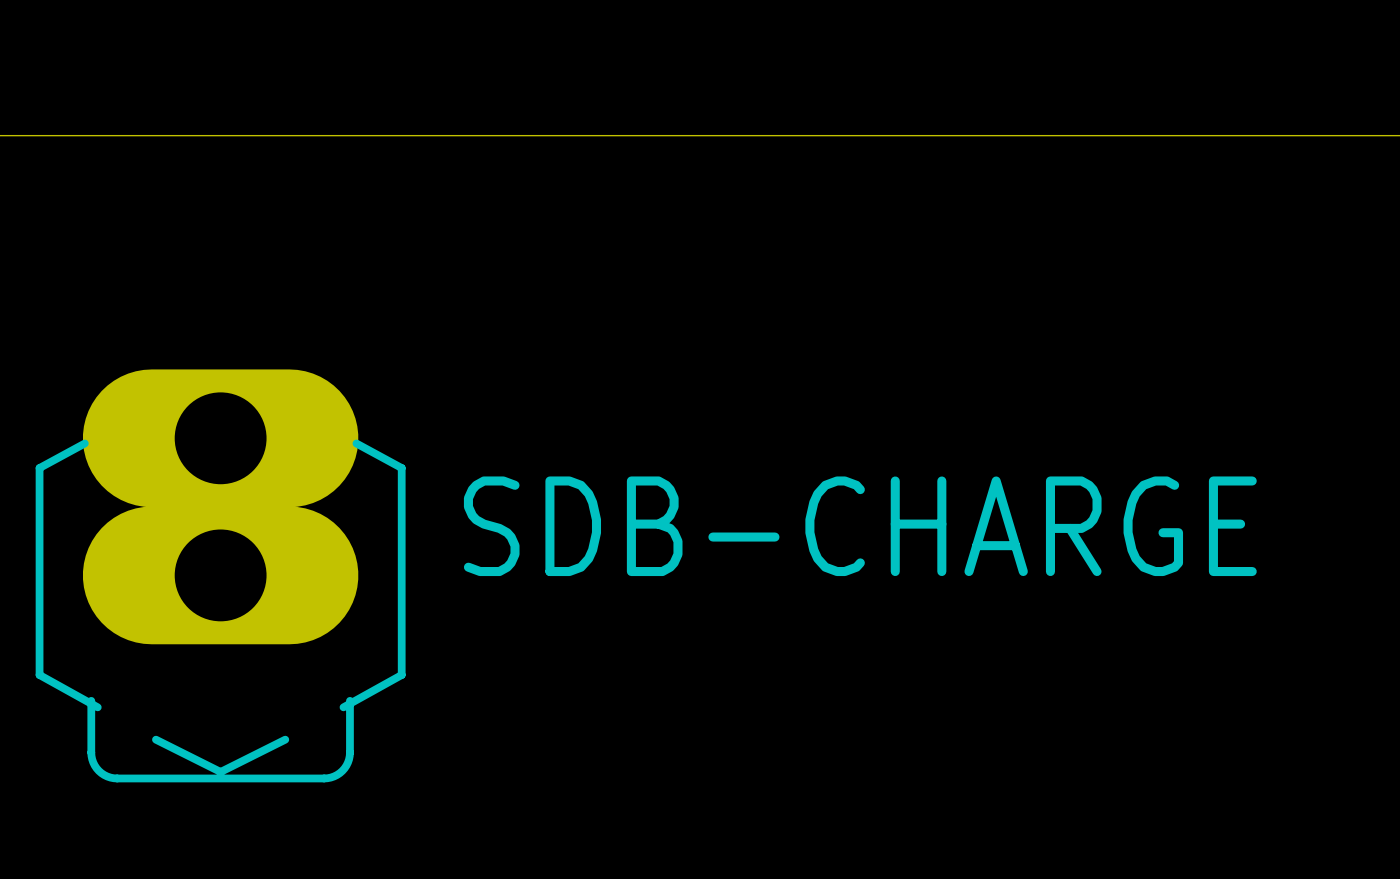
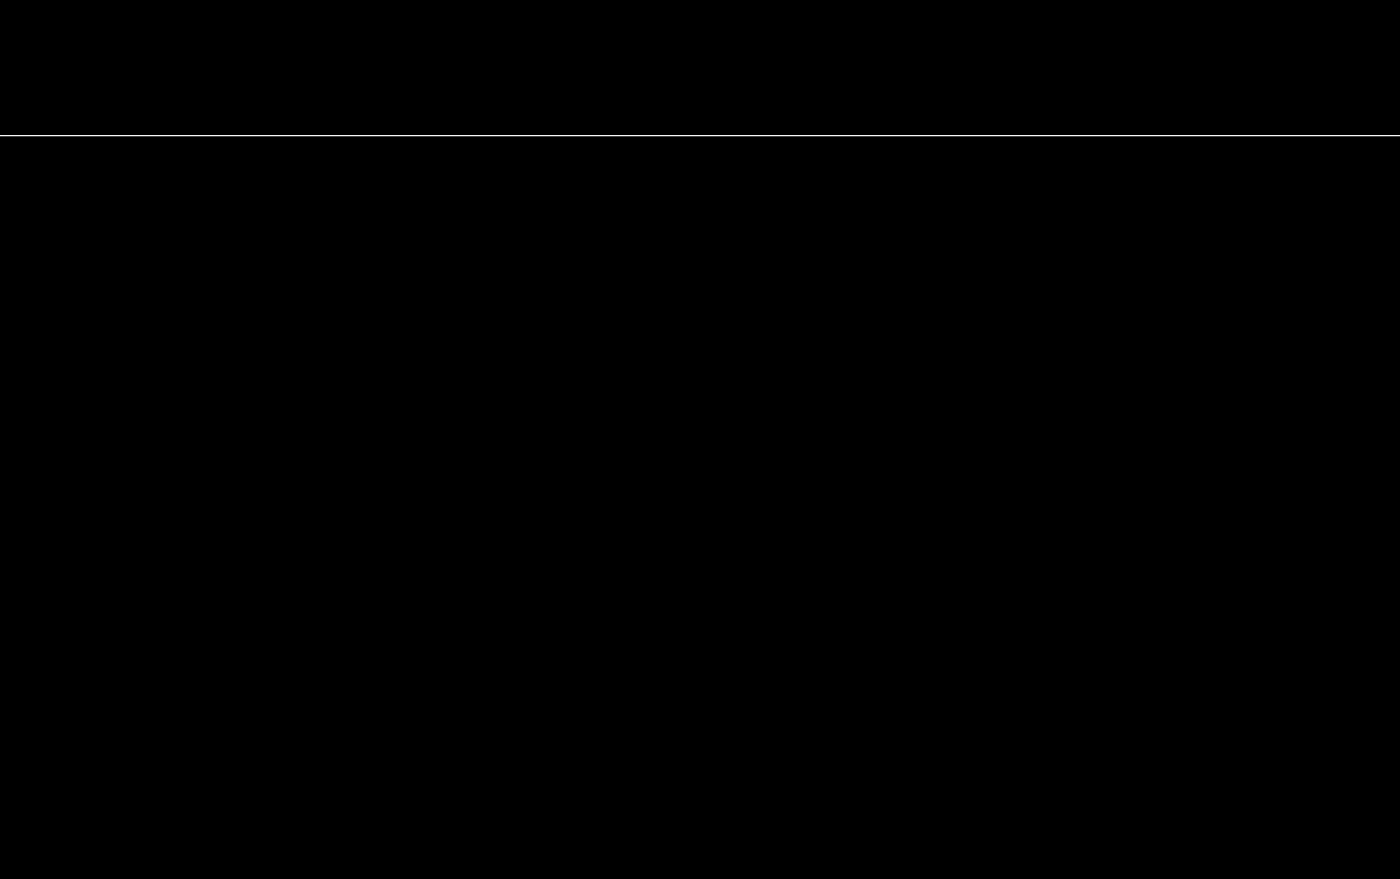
SDB-CHARGE: (220, 575) -> none

